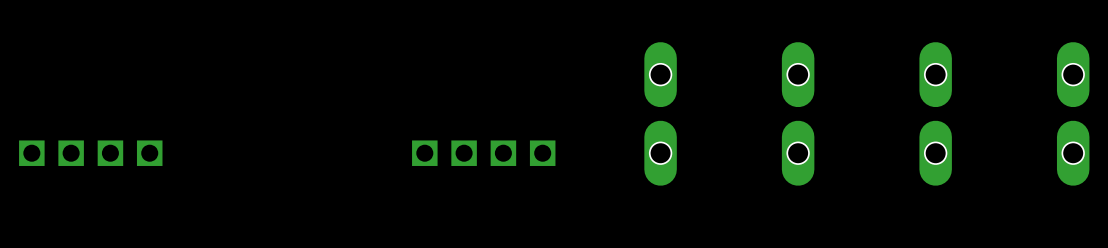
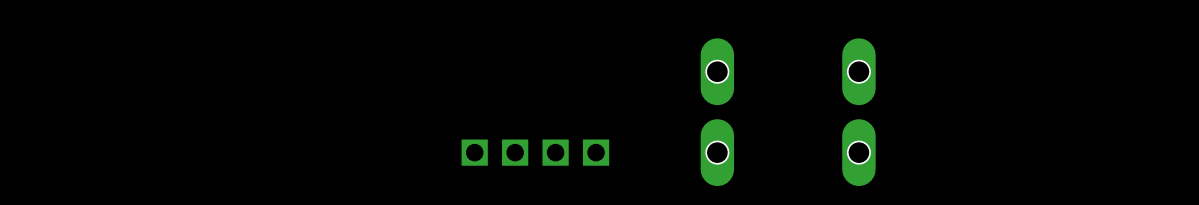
part: (935, 113) -> none
part: (1073, 113) -> none
part: (90, 153) -> none

